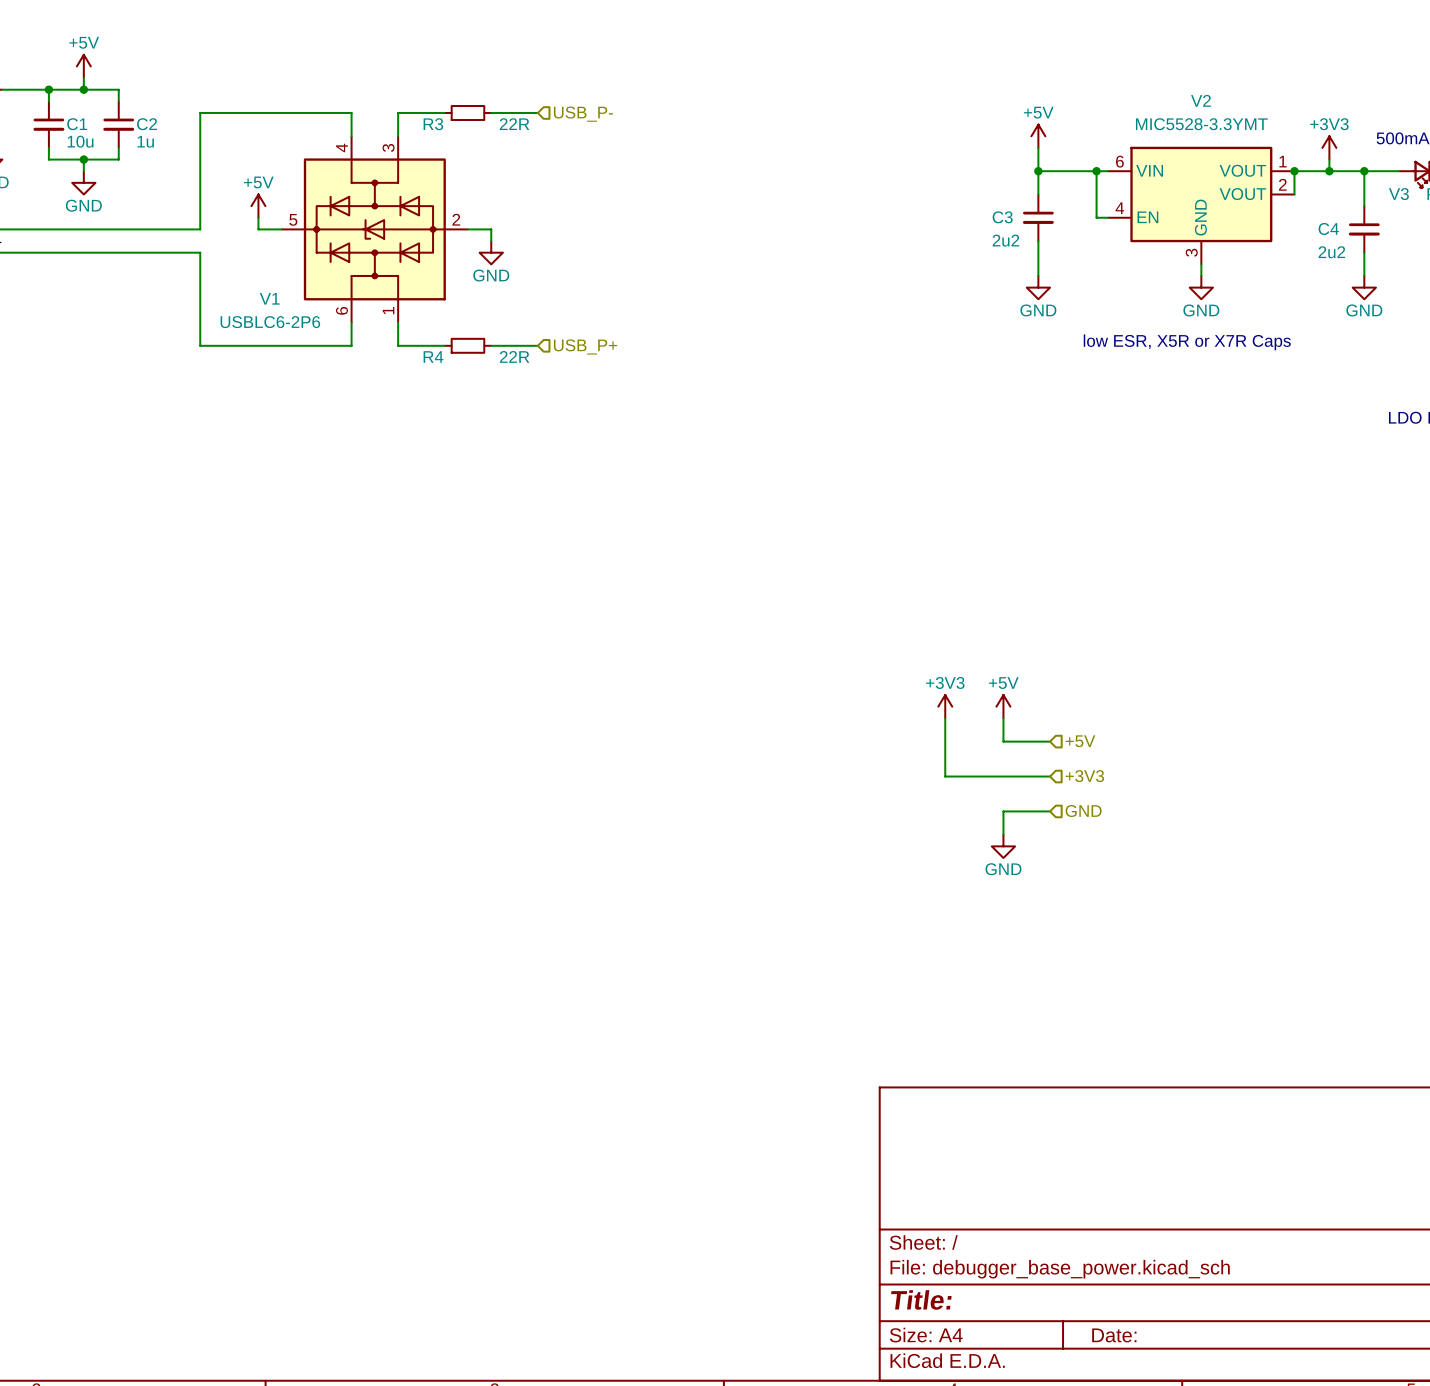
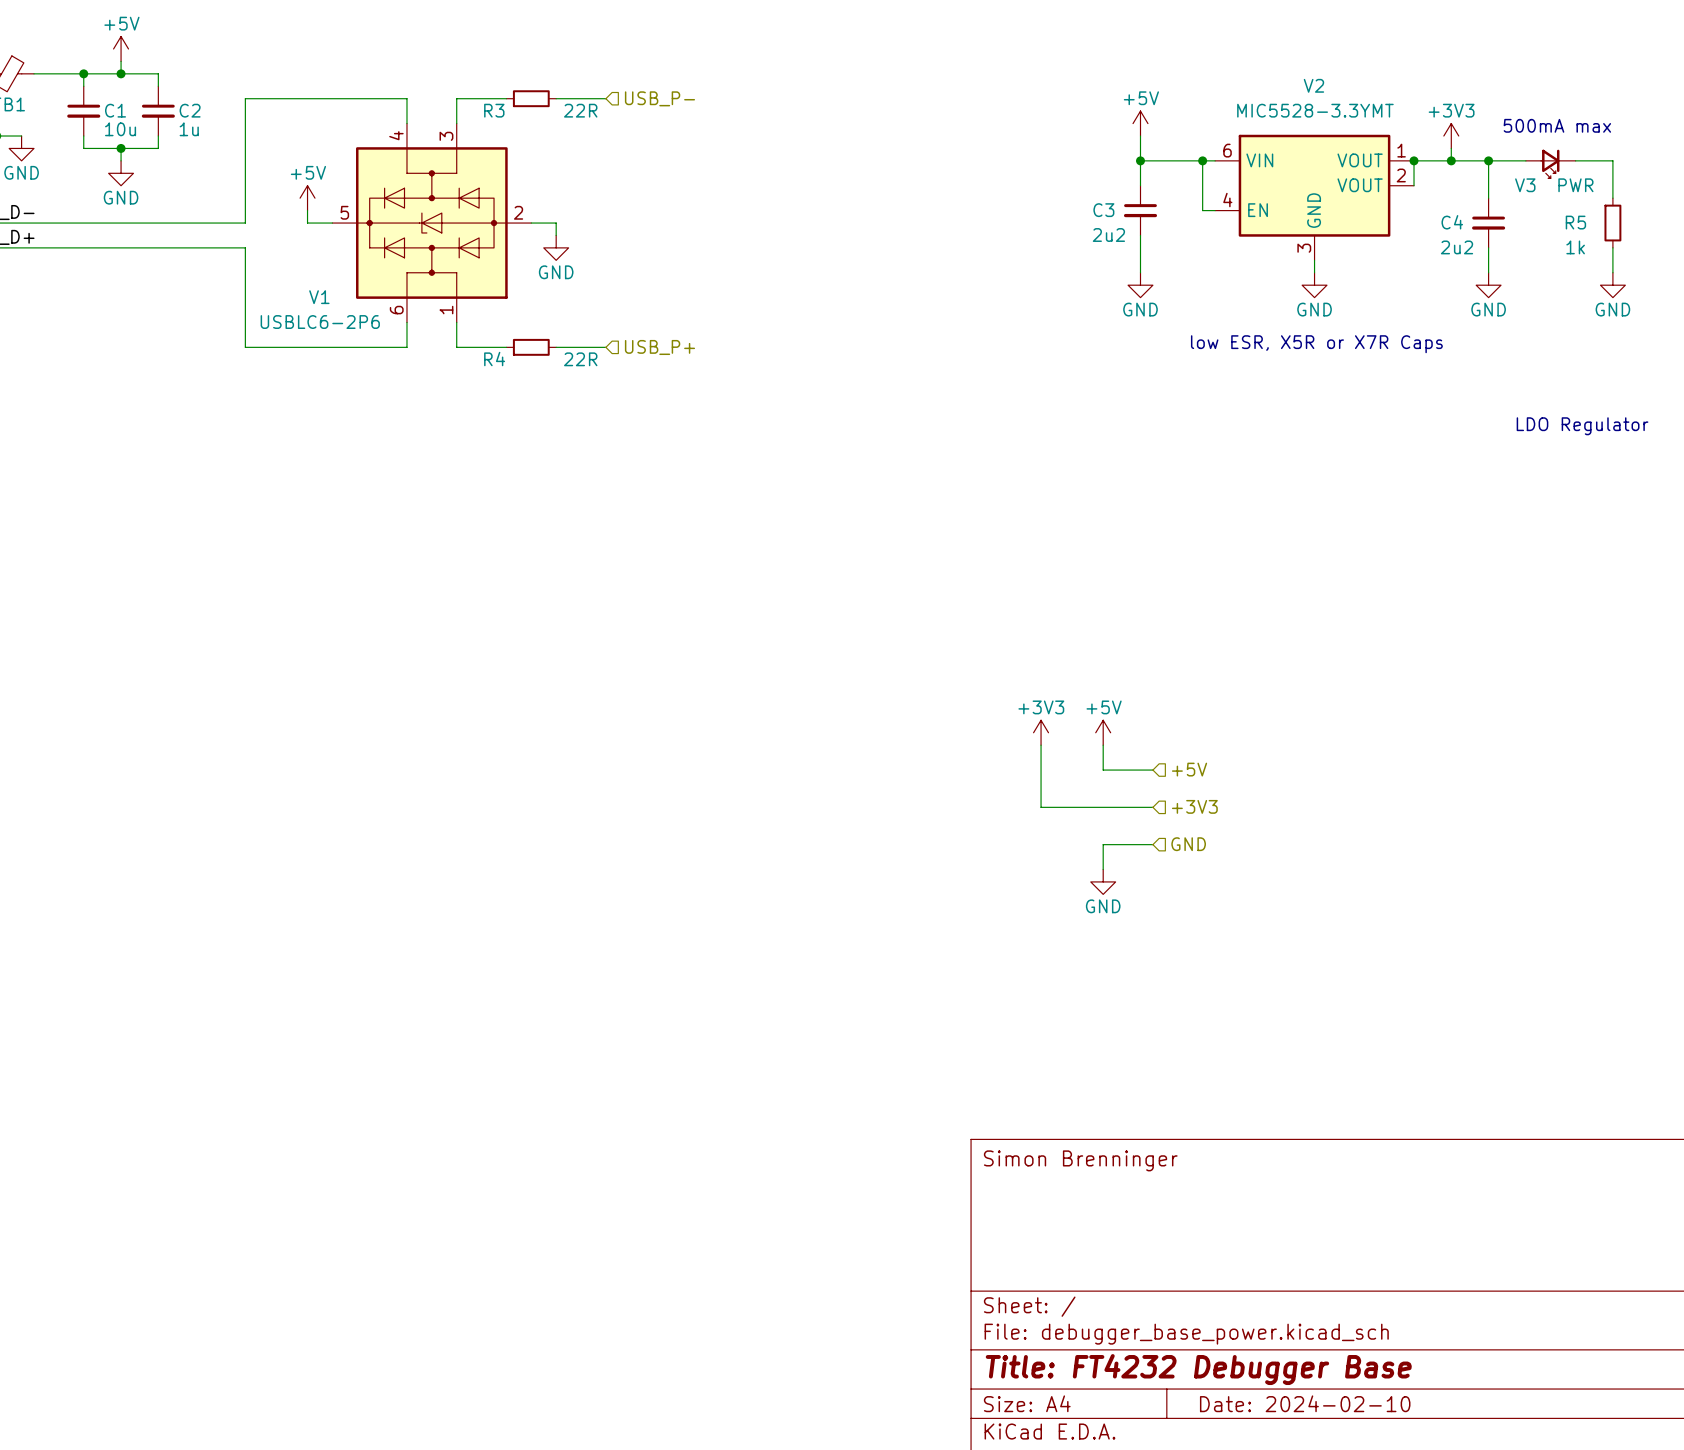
title block: none -> Simon Brenninger (1080, 1160)
title block: Title: (921, 1299) -> Title: FT4232 Debugger Base (1198, 1369)
title block: Date: (1114, 1335) -> Date: 2024-02-10 (1305, 1403)

